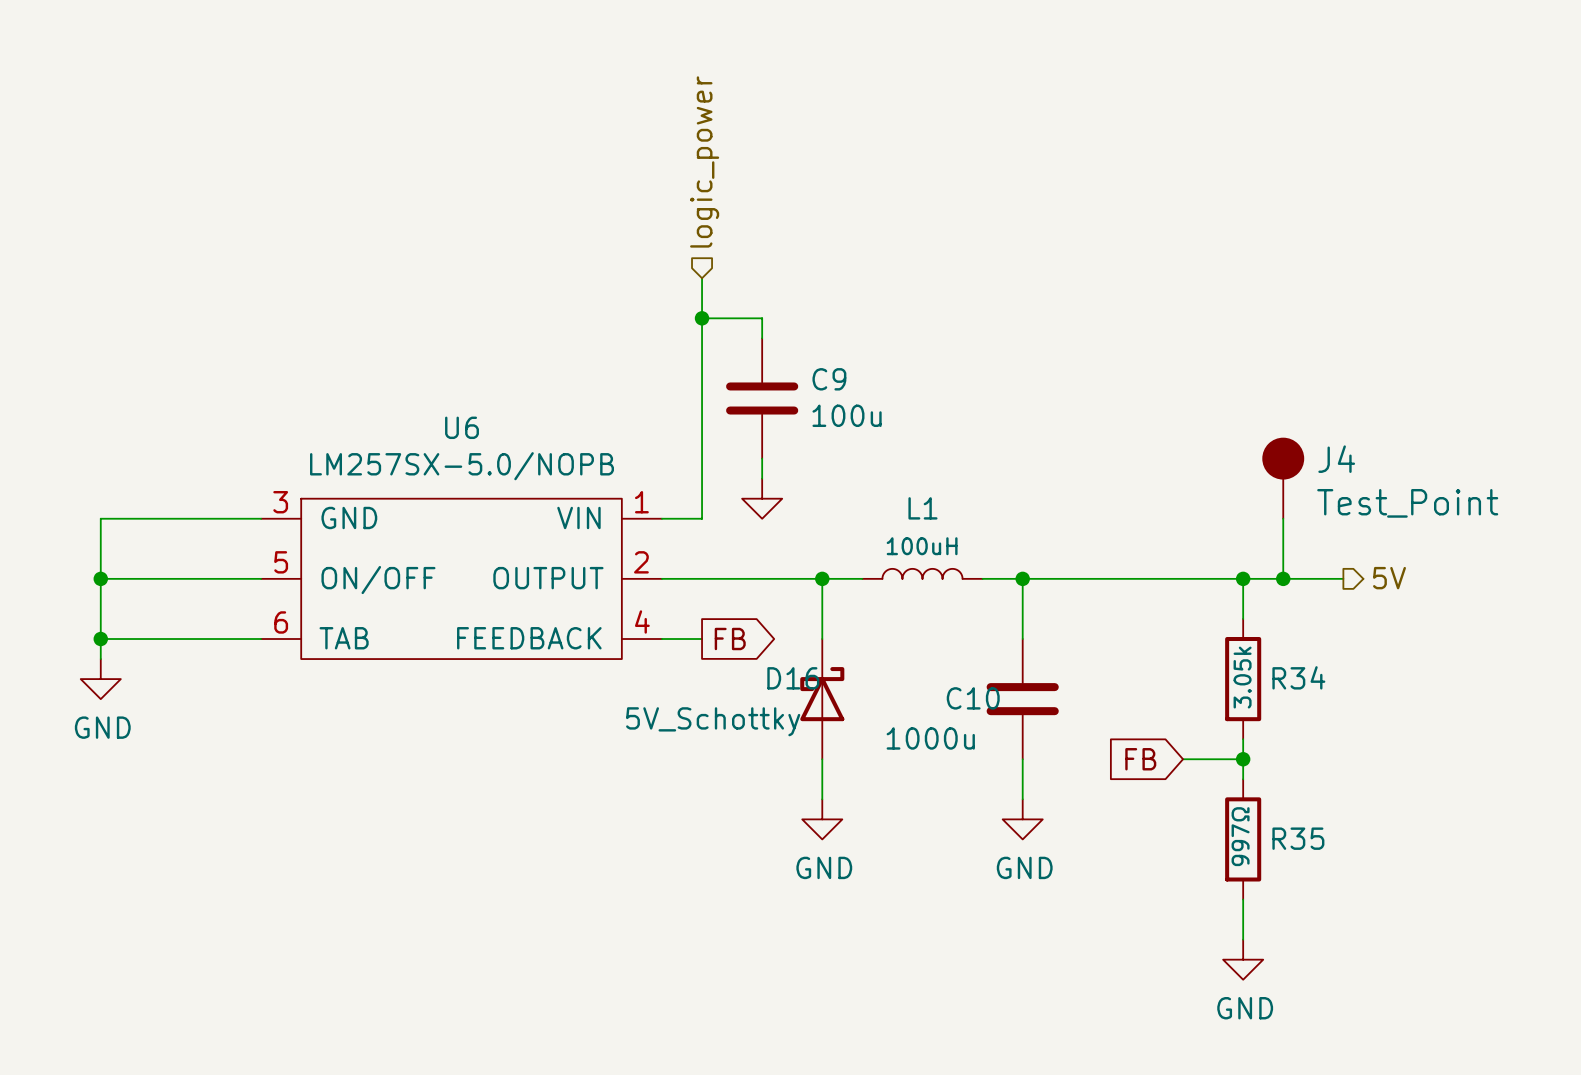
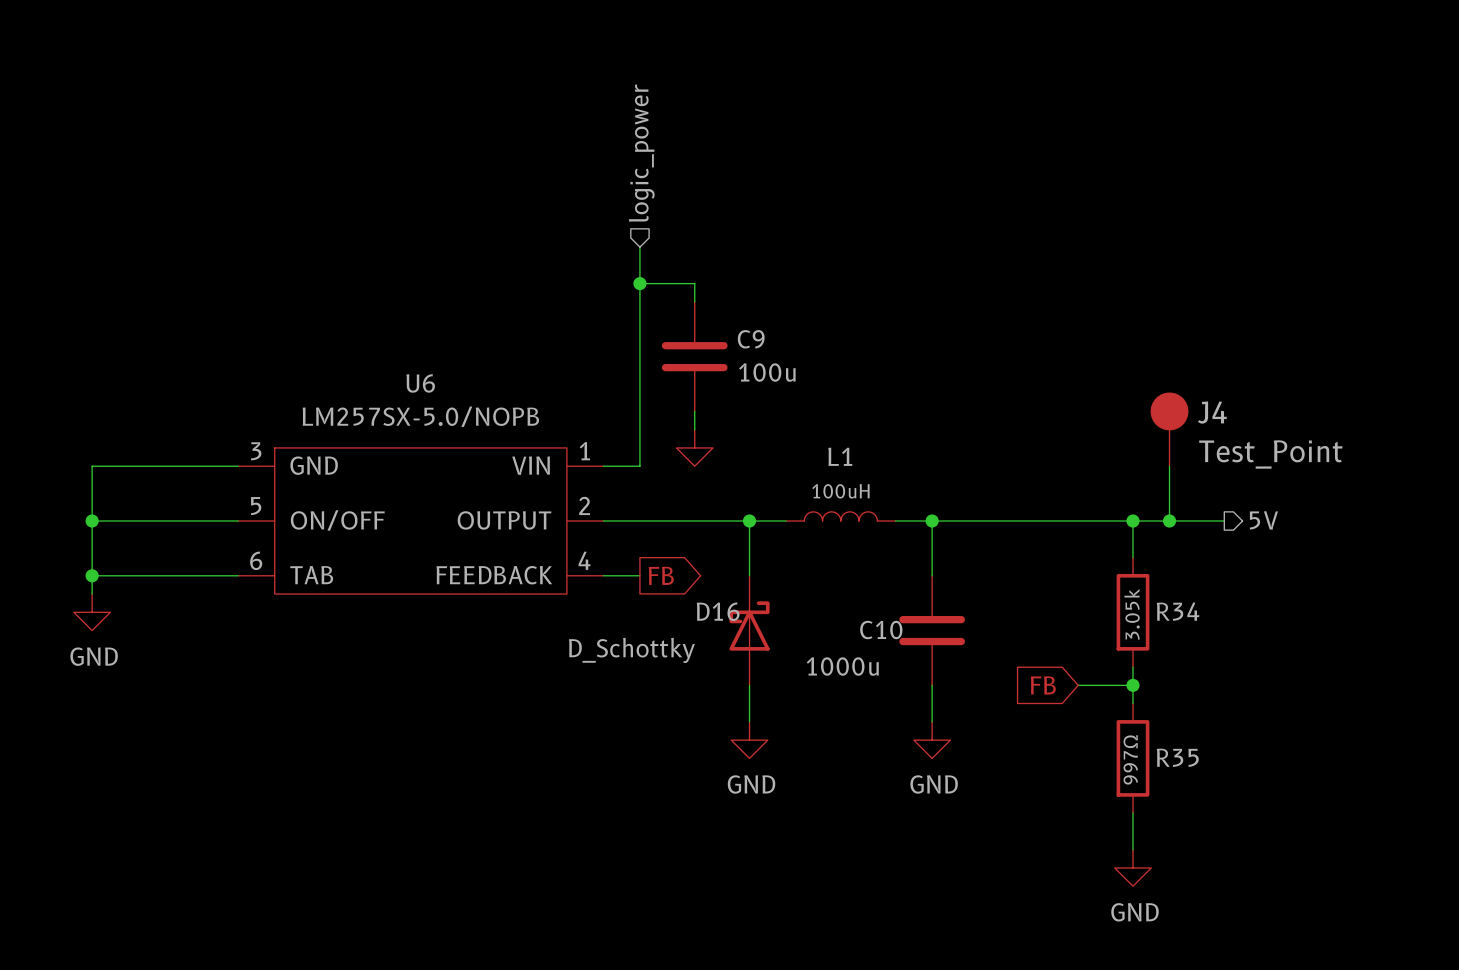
D16 value: 5V_Schottky (713, 721) -> D_Schottky (631, 650)

